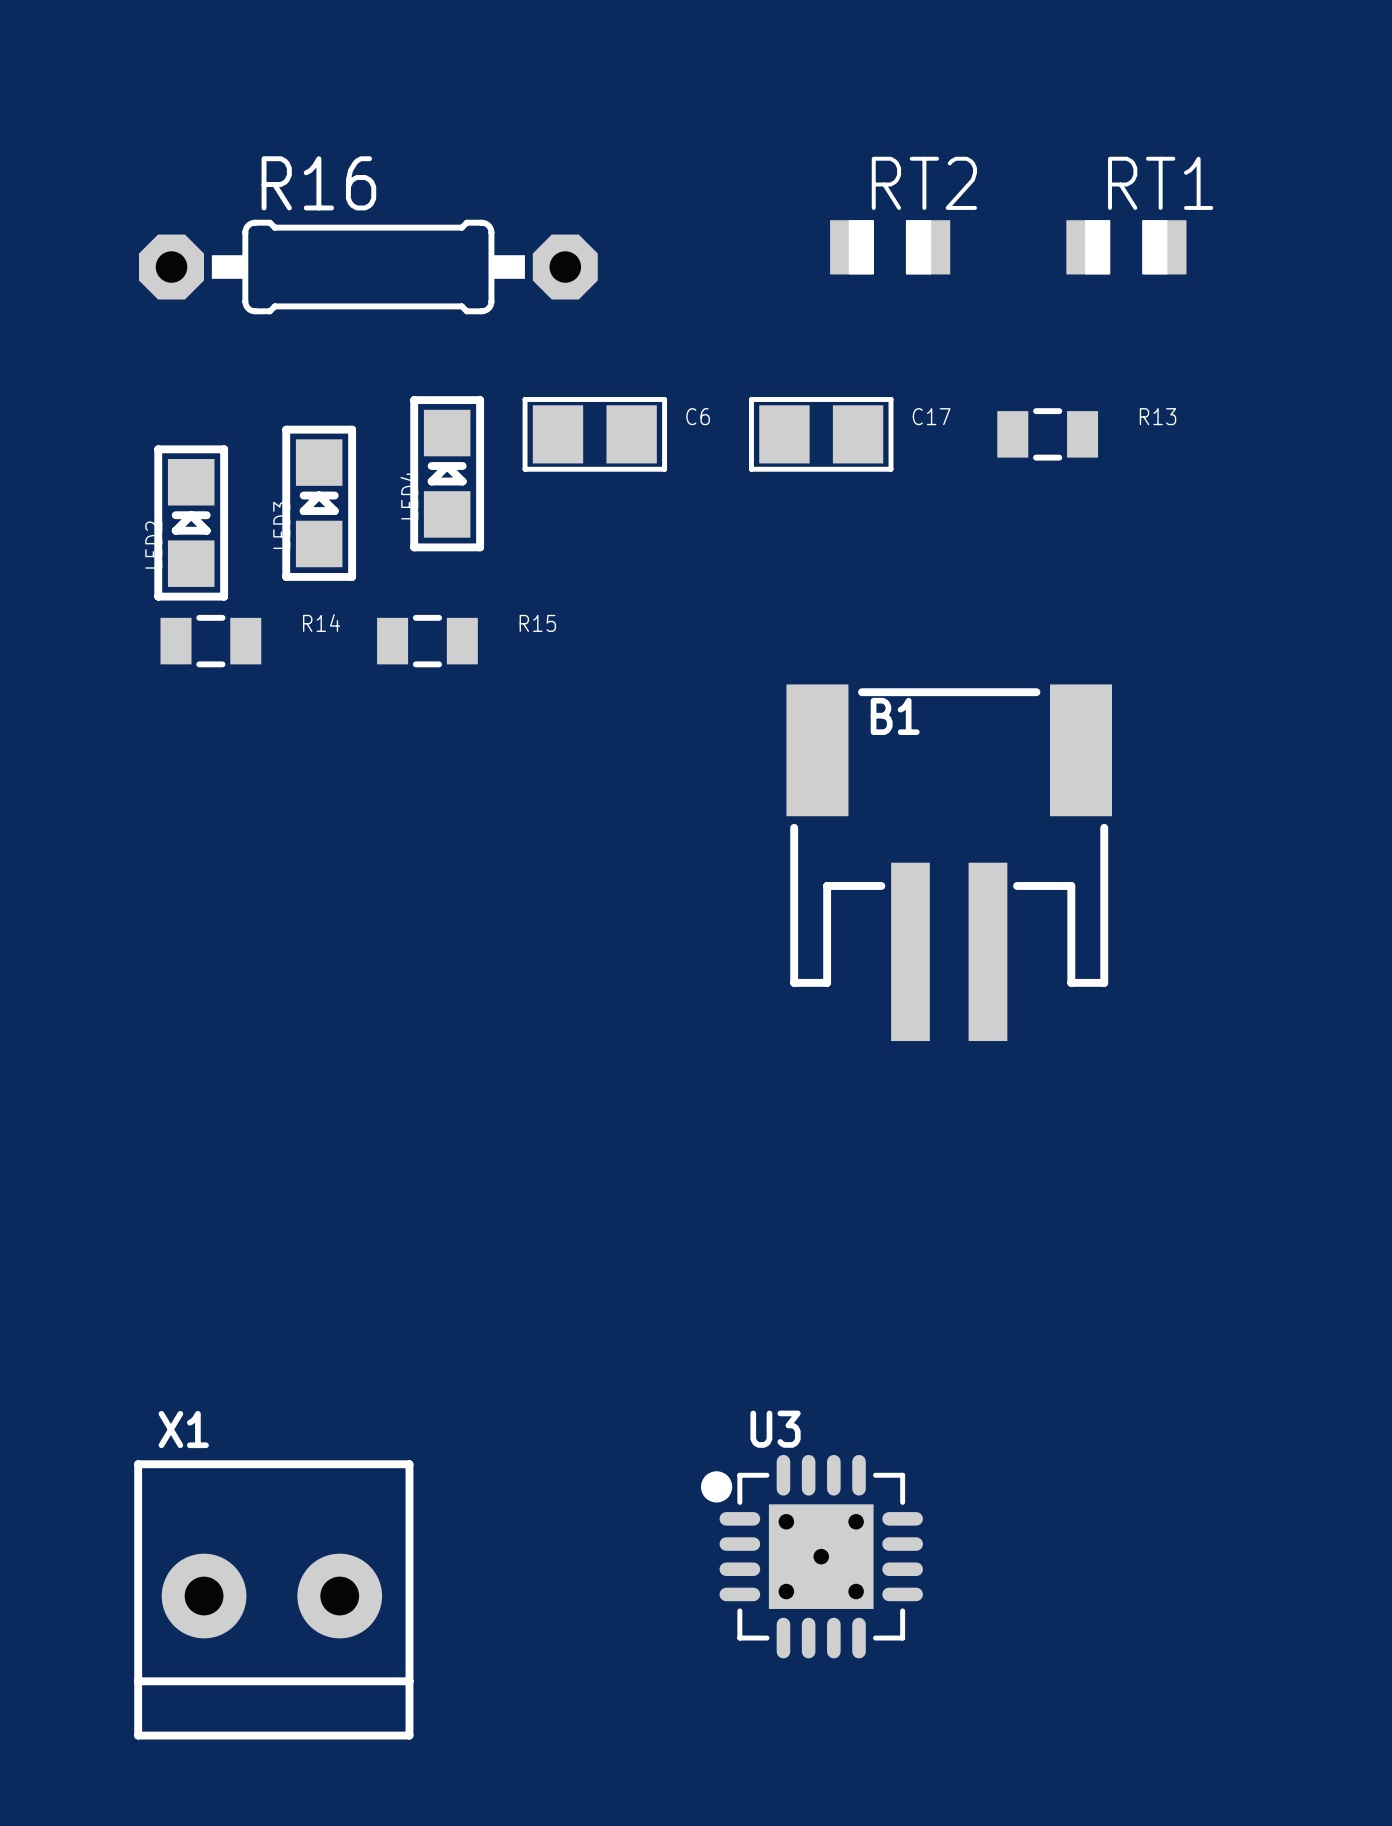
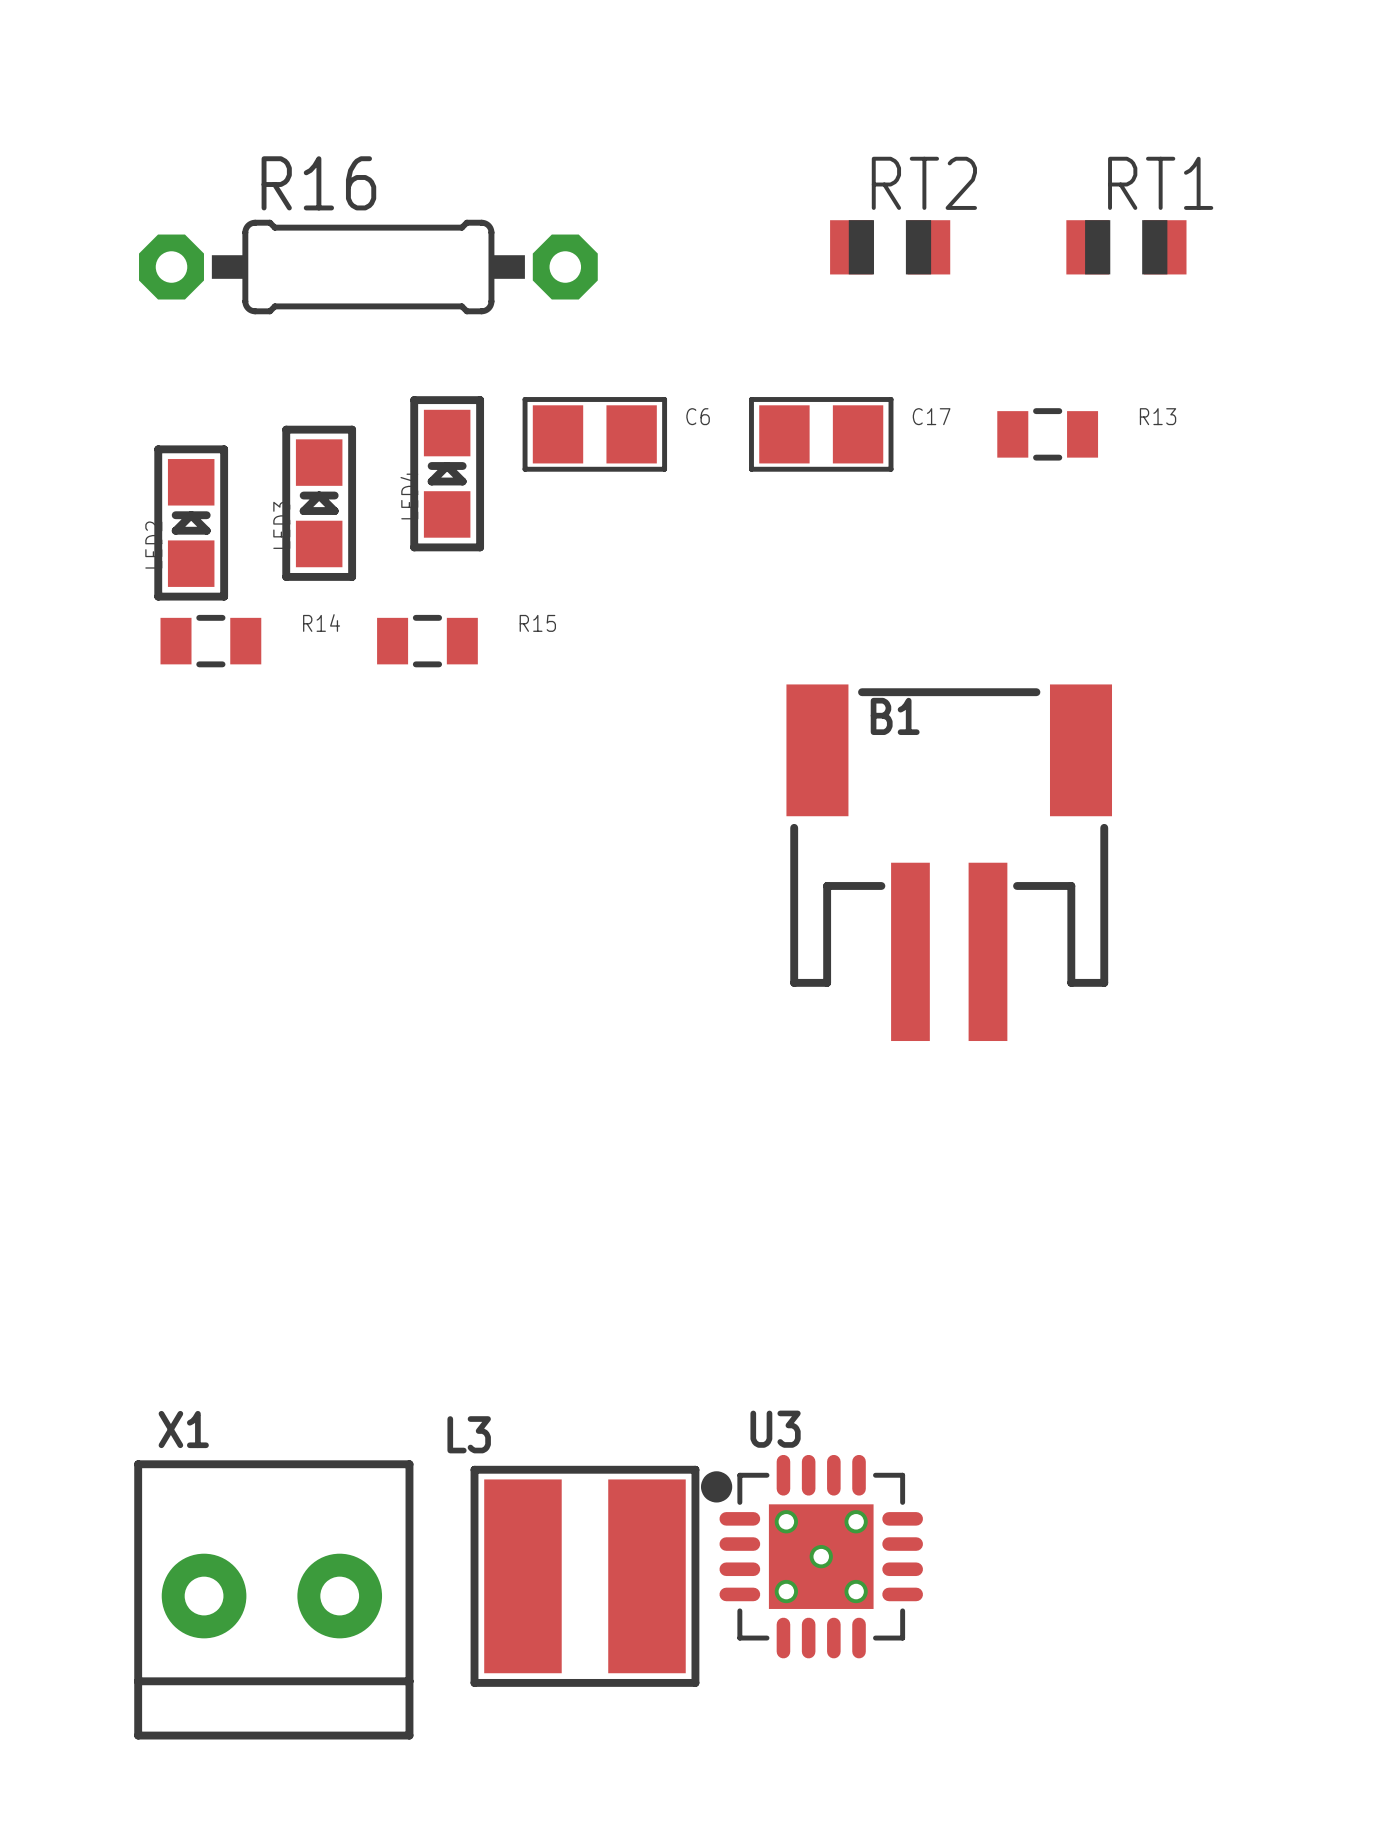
L3: none -> (584, 1576)

